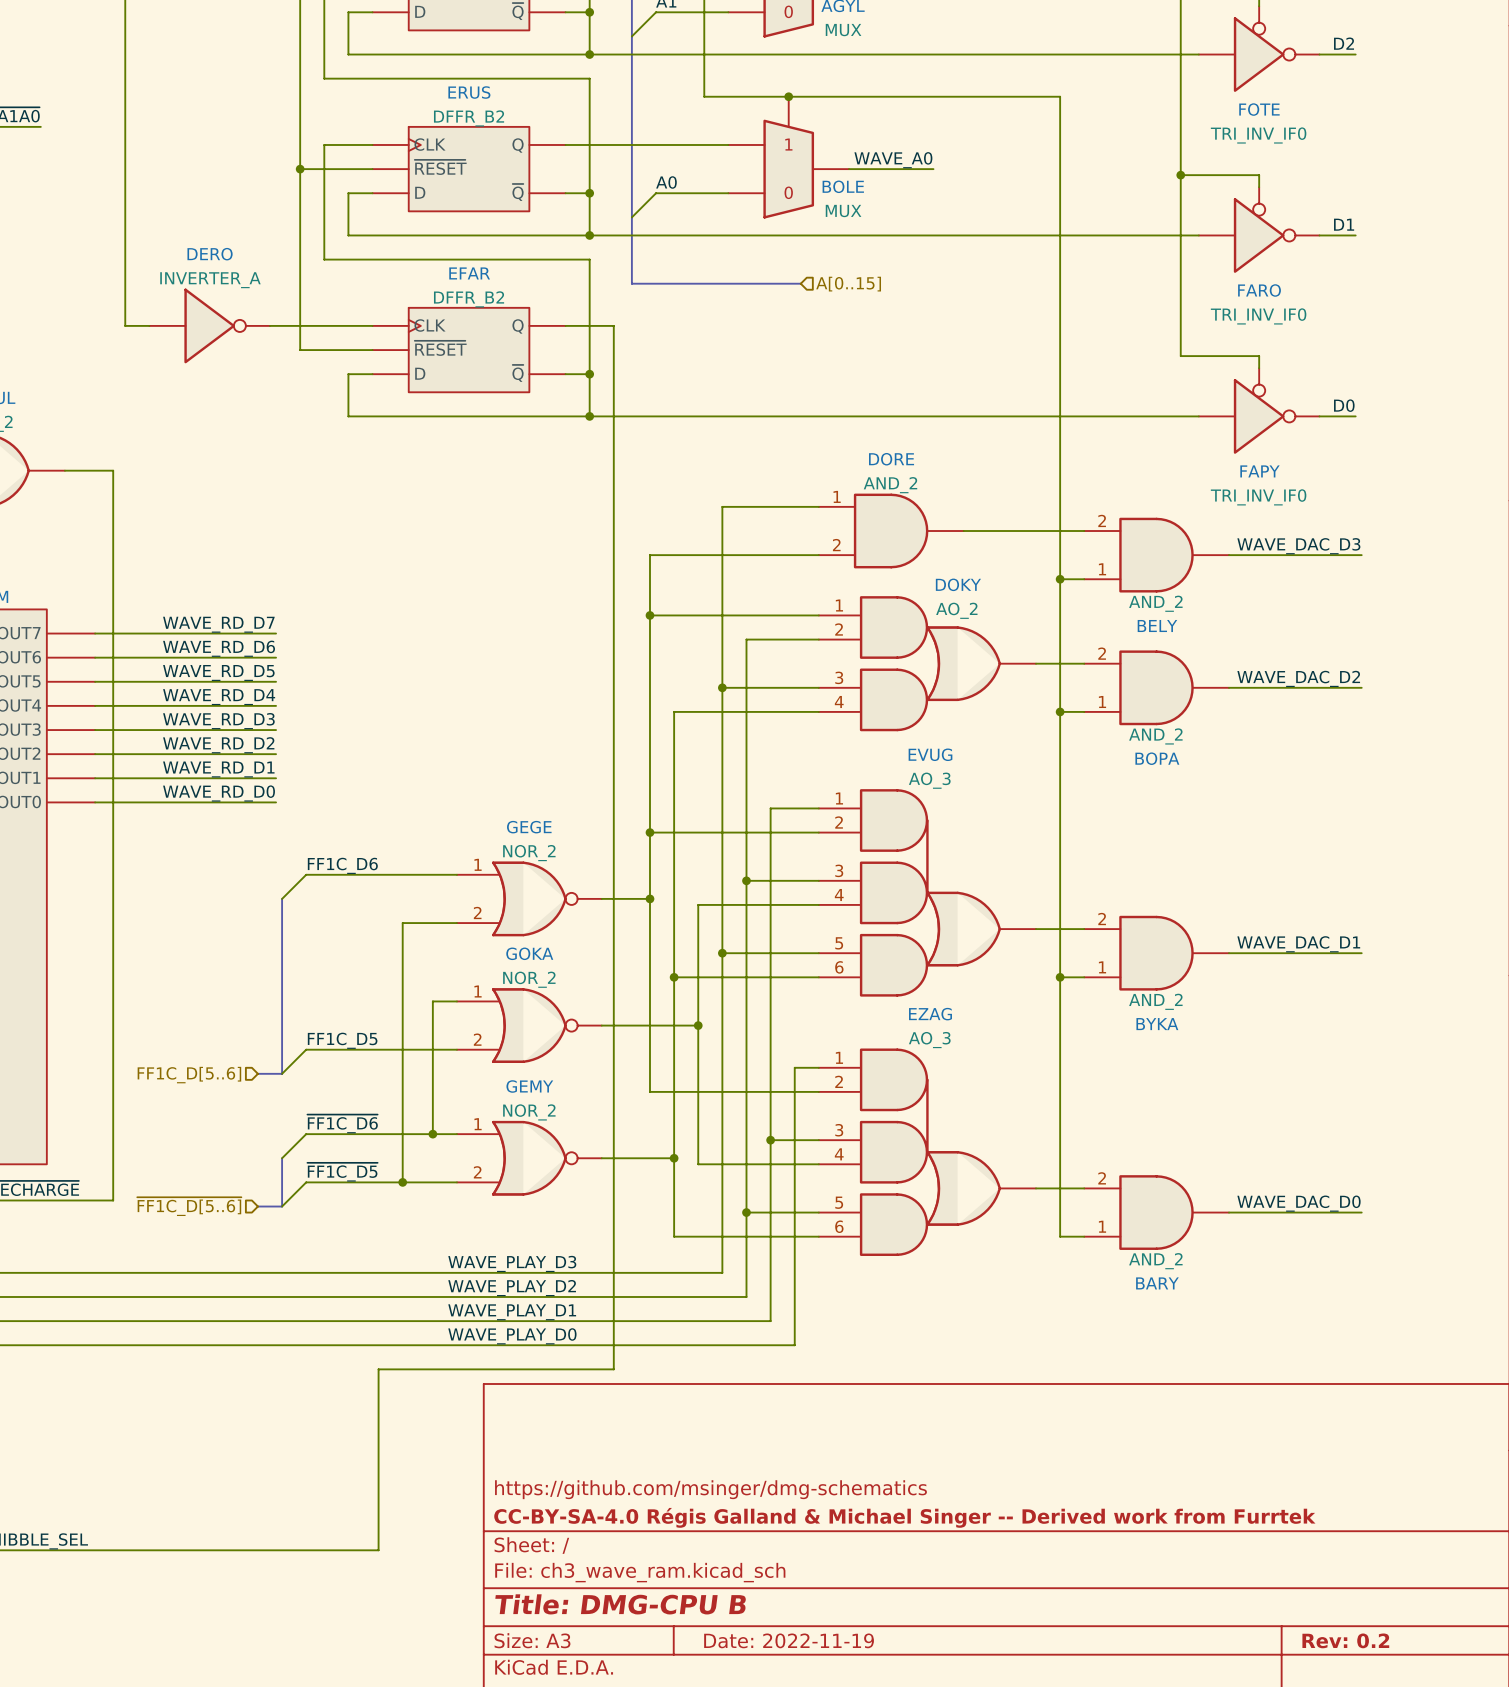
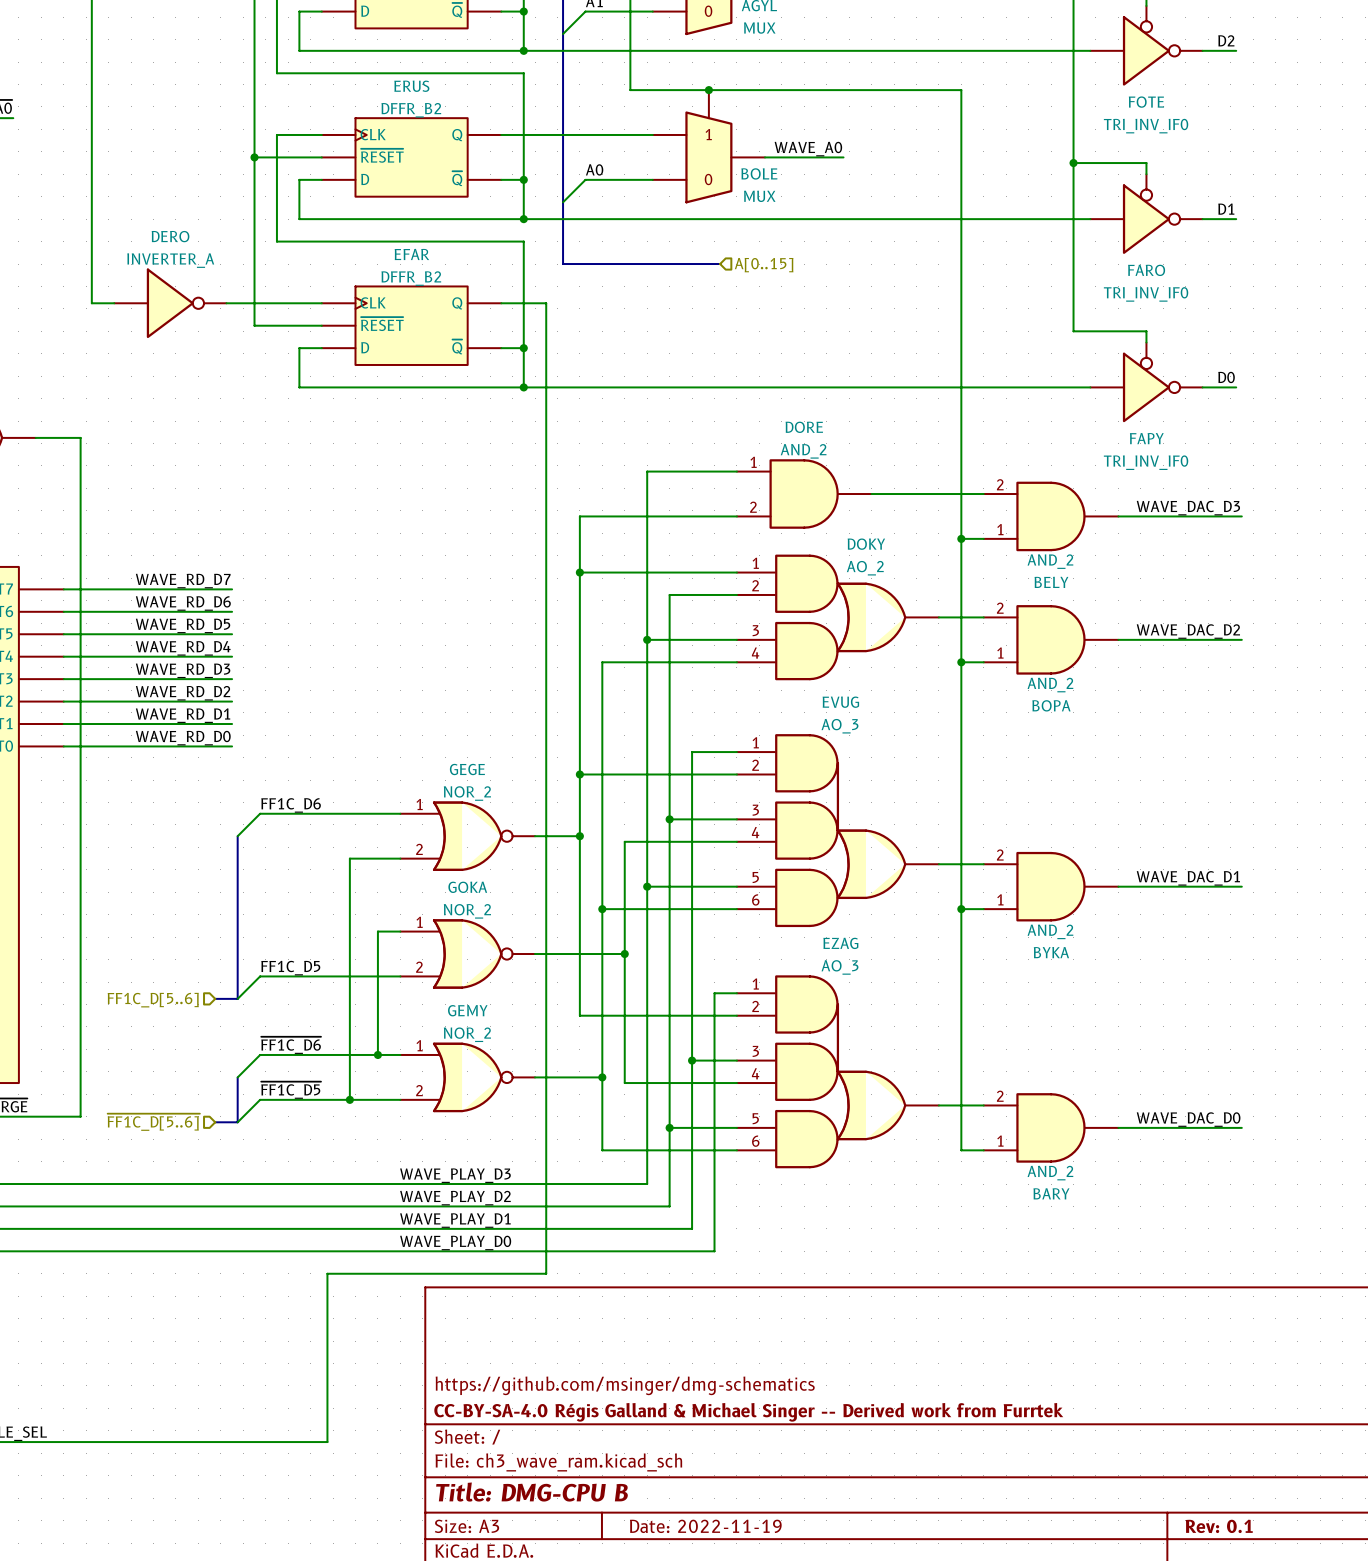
title block: Rev: 0.2 (1345, 1640) -> Rev: 0.1 (1219, 1526)

